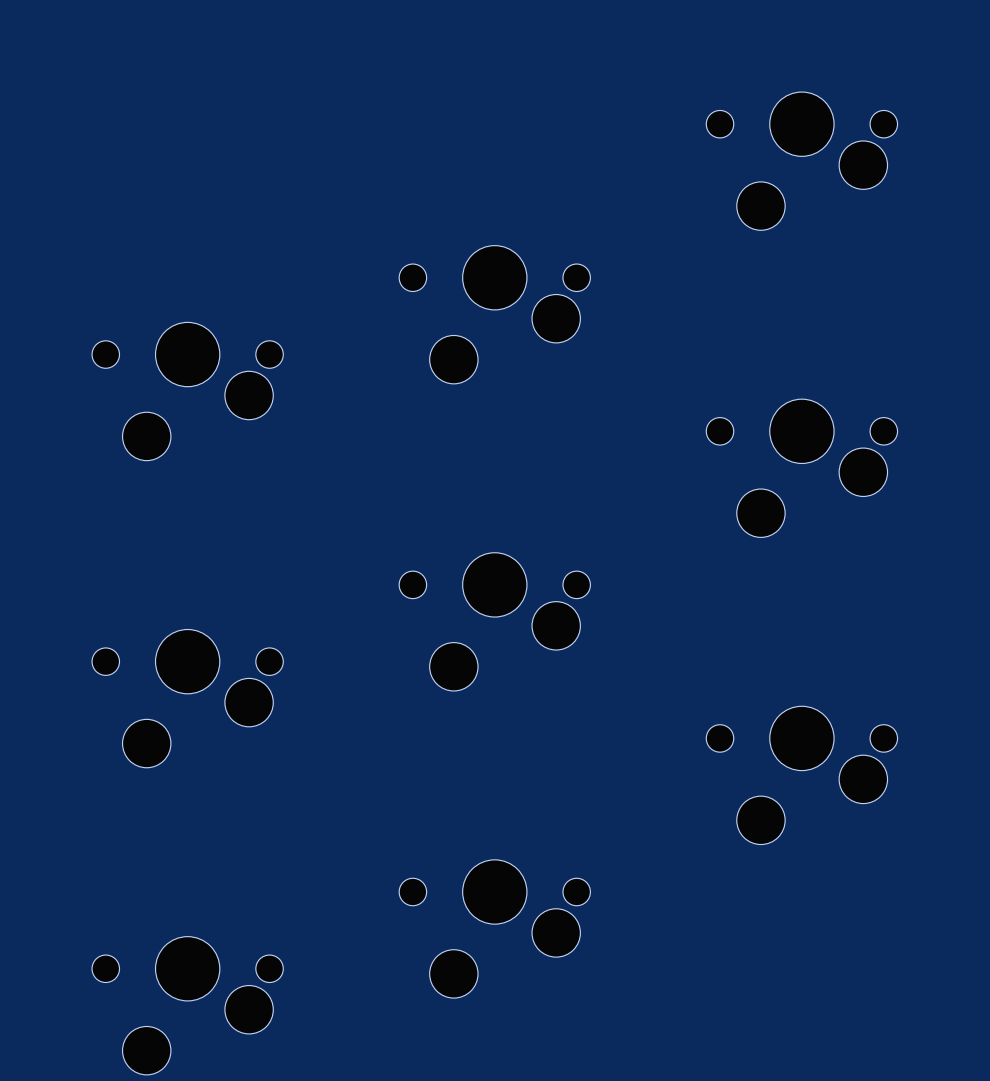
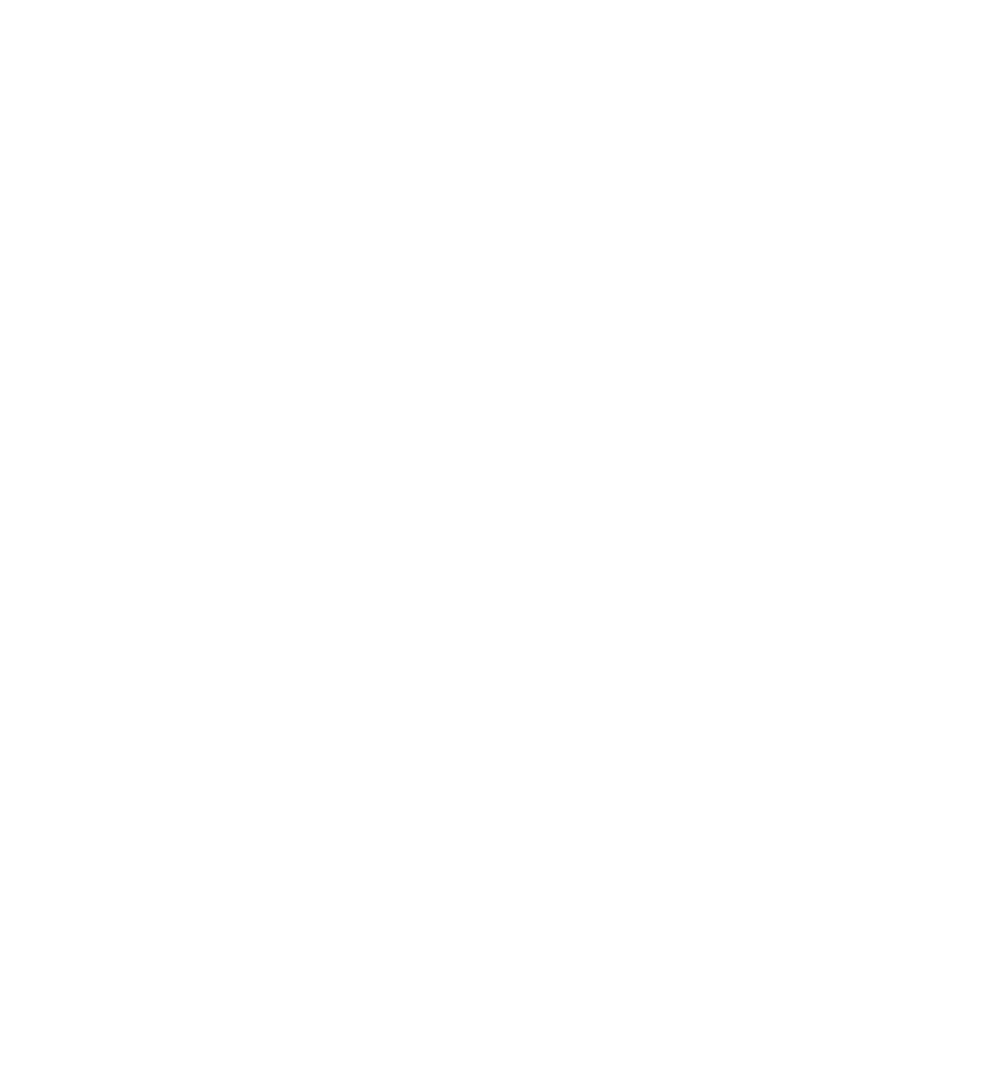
part: (801, 161) -> none
part: (494, 314) -> none
part: (187, 391) -> none
part: (801, 468) -> none
part: (494, 621) -> none
part: (187, 698) -> none
part: (801, 775) -> none
part: (494, 928) -> none
part: (187, 1005) -> none

